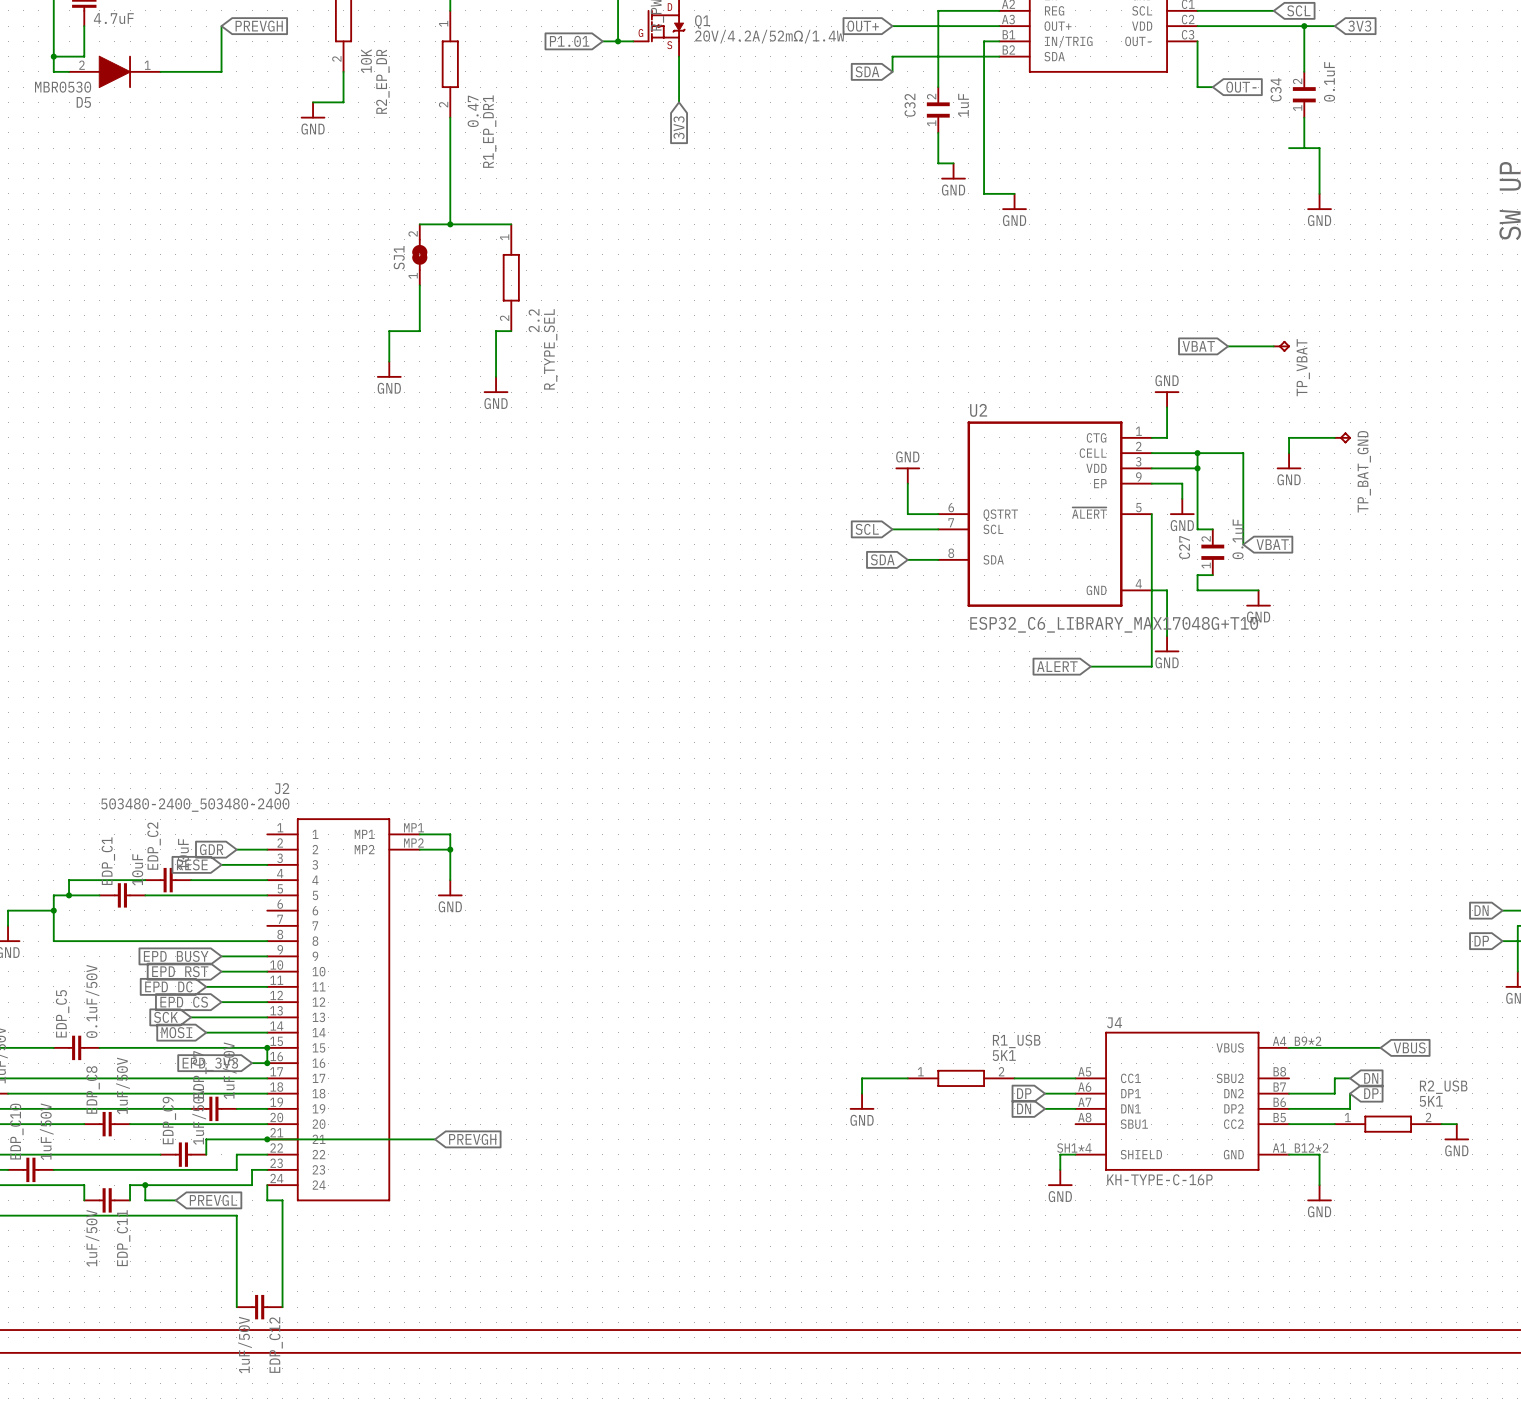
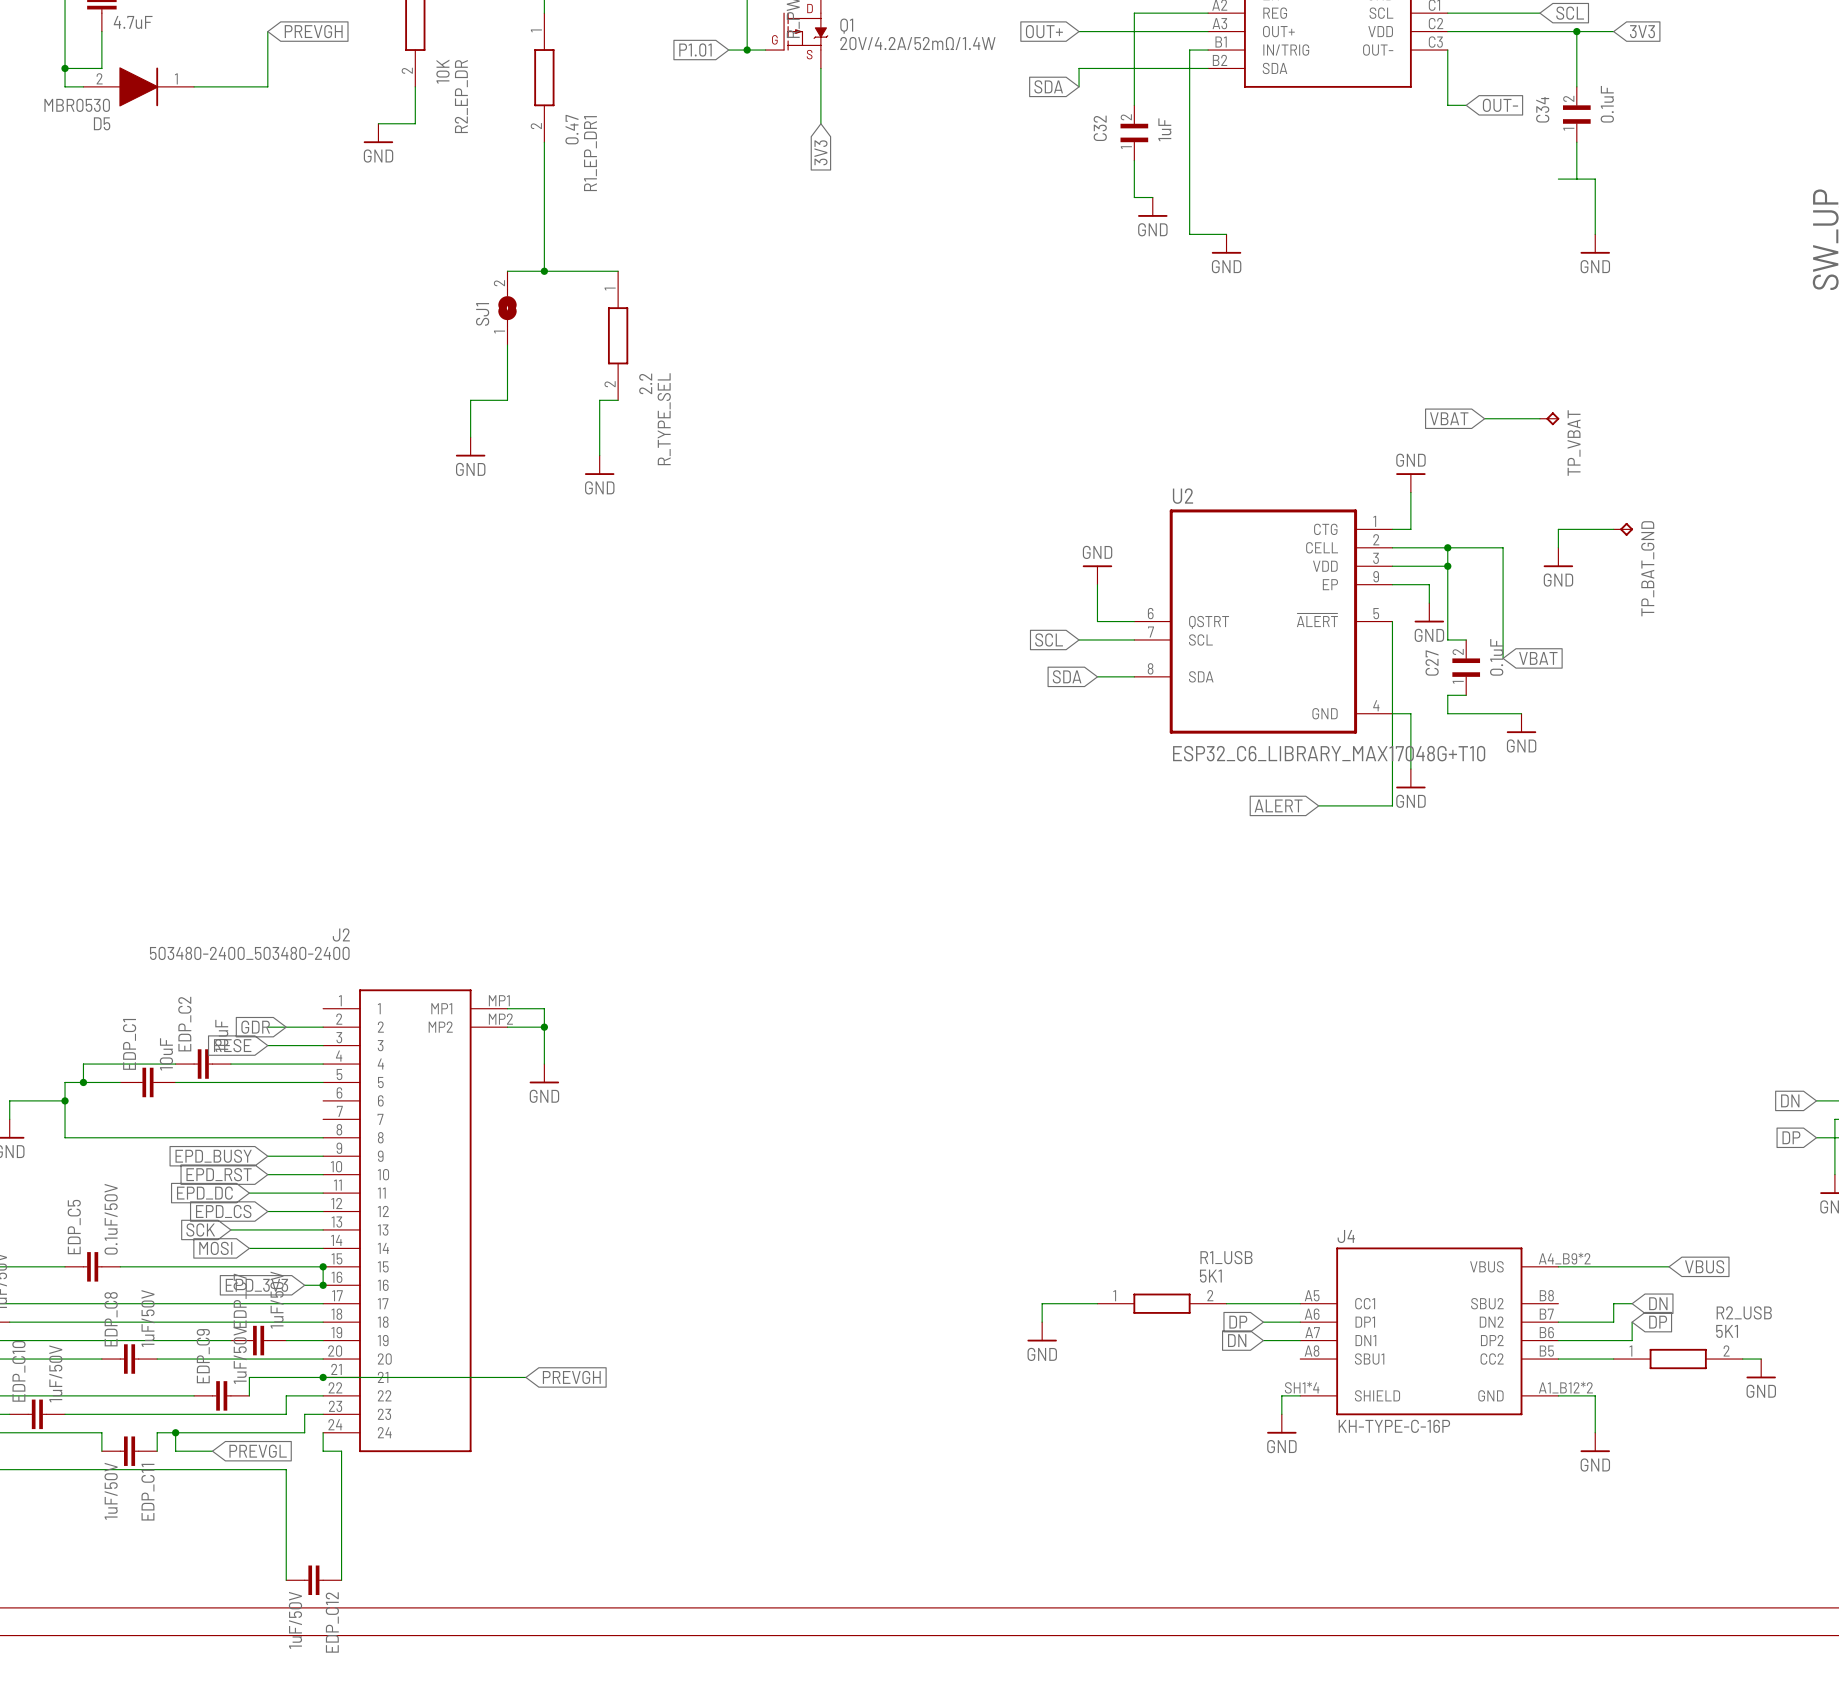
J2 name position: J2 (281, 788) -> J2 (341, 934)
J2 value position: 503480-2400_503480-2400 (195, 805) -> 503480-2400_503480-2400 (249, 953)
wire: none -> (267, 1027) (286, 1027)

